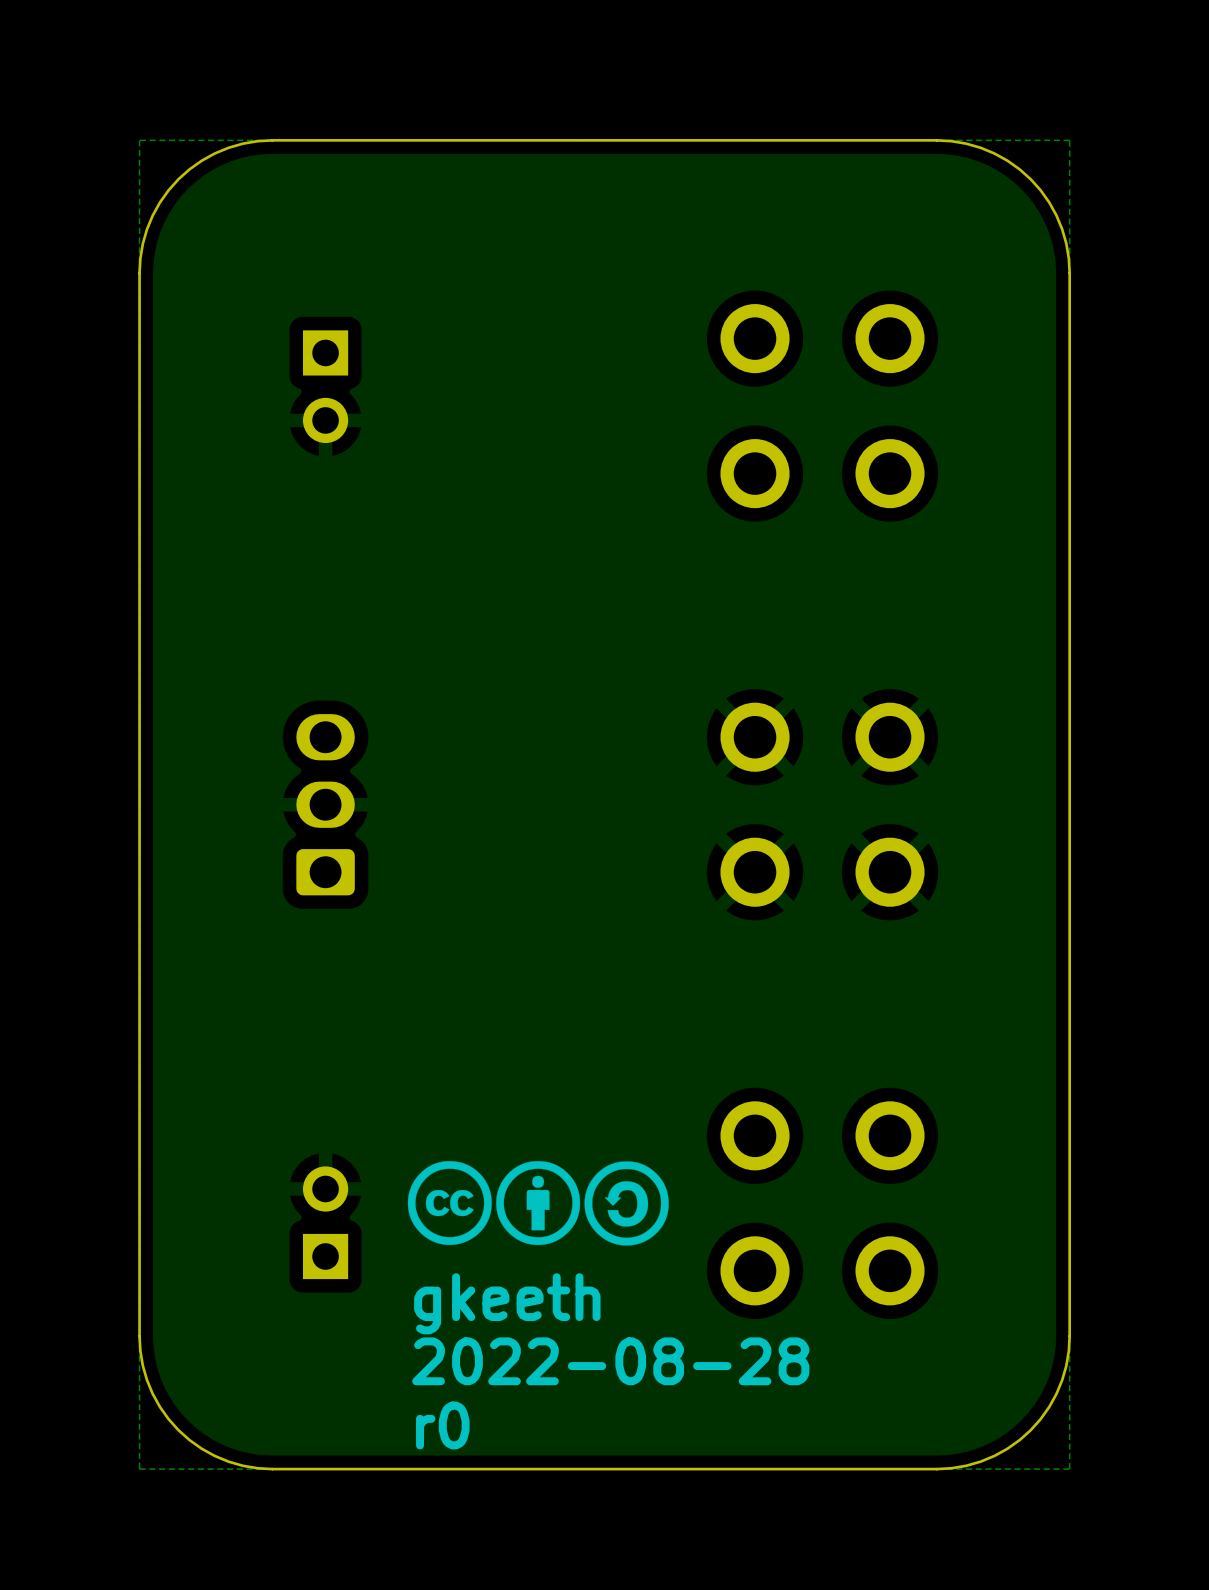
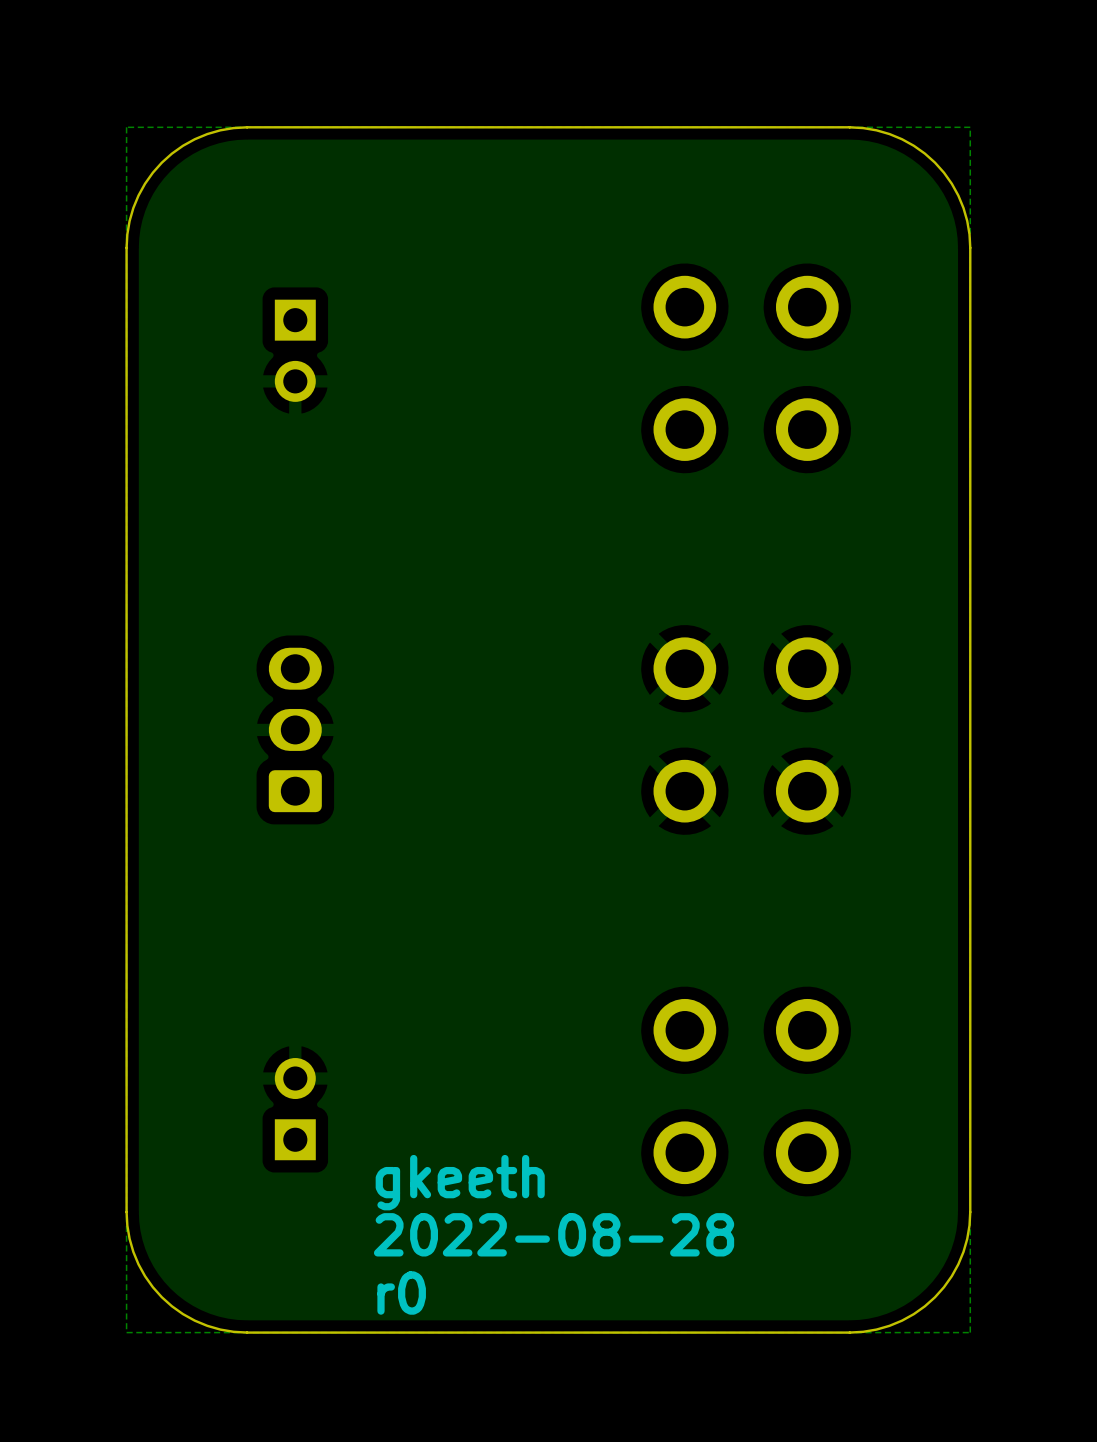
drawing: [407, 1161, 669, 1246] -> none

